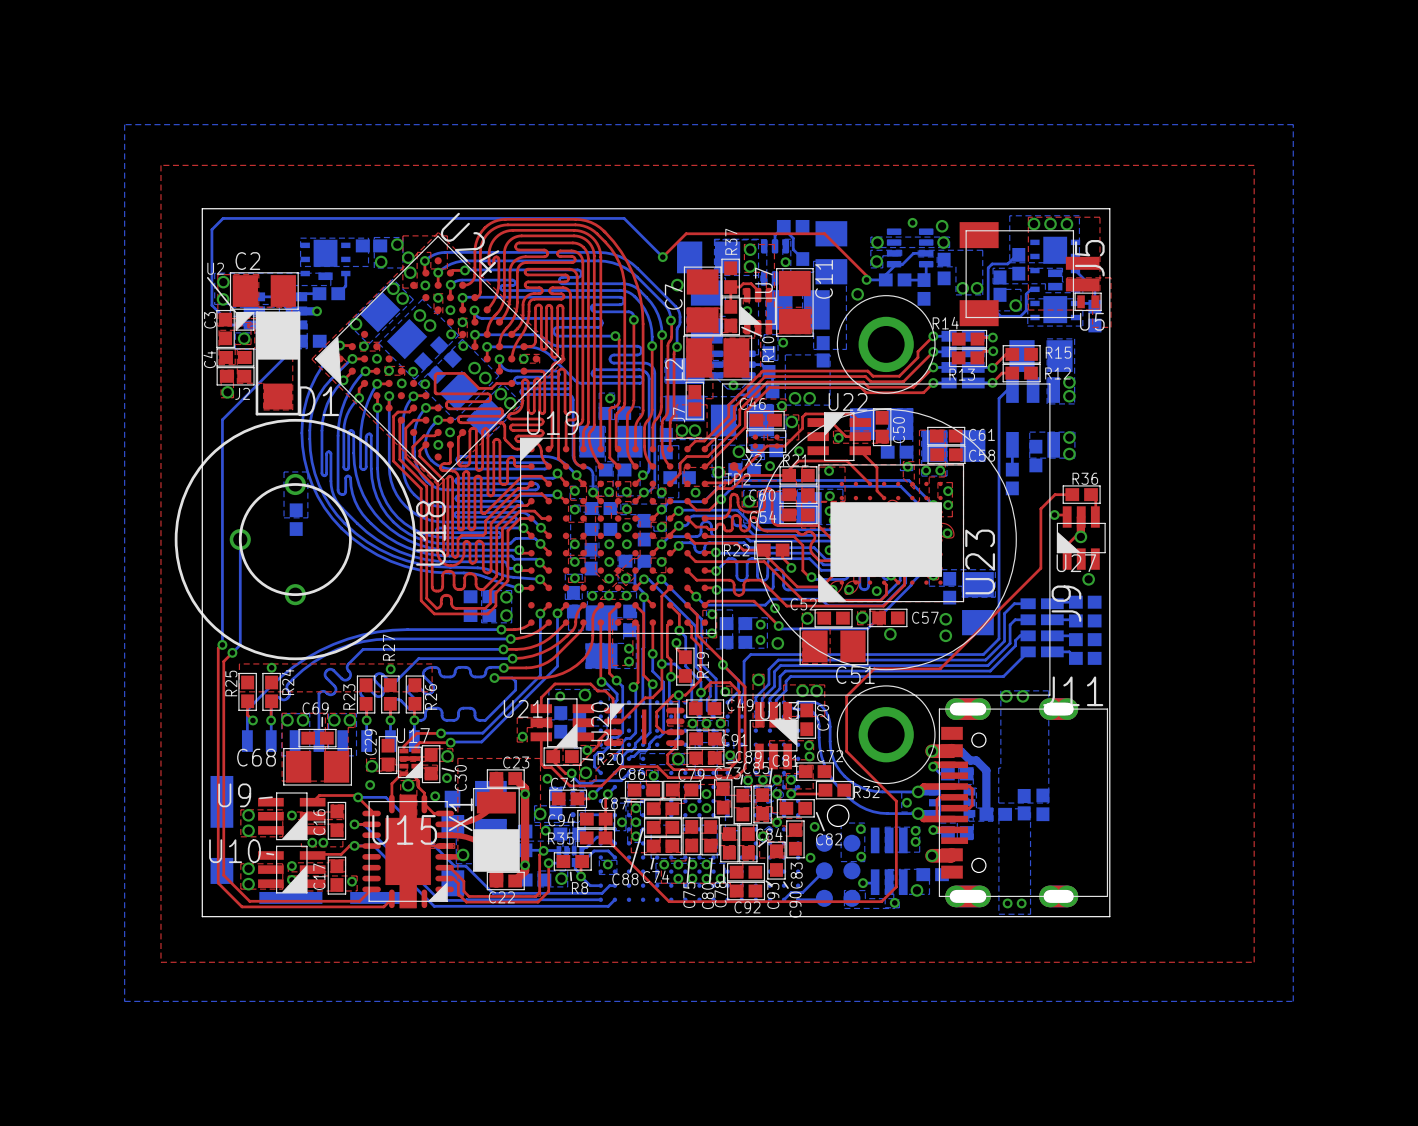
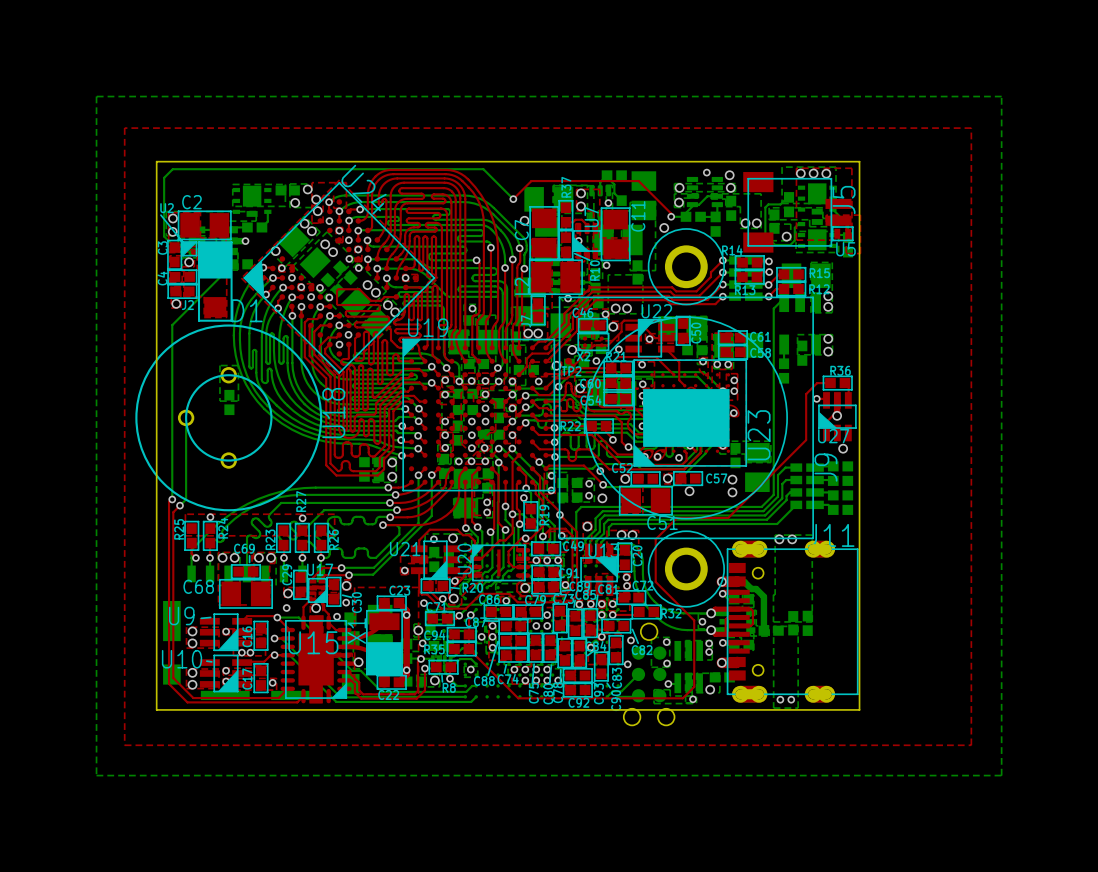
part footprint: [815, 804, 861, 907] -> [623, 623, 675, 726]

